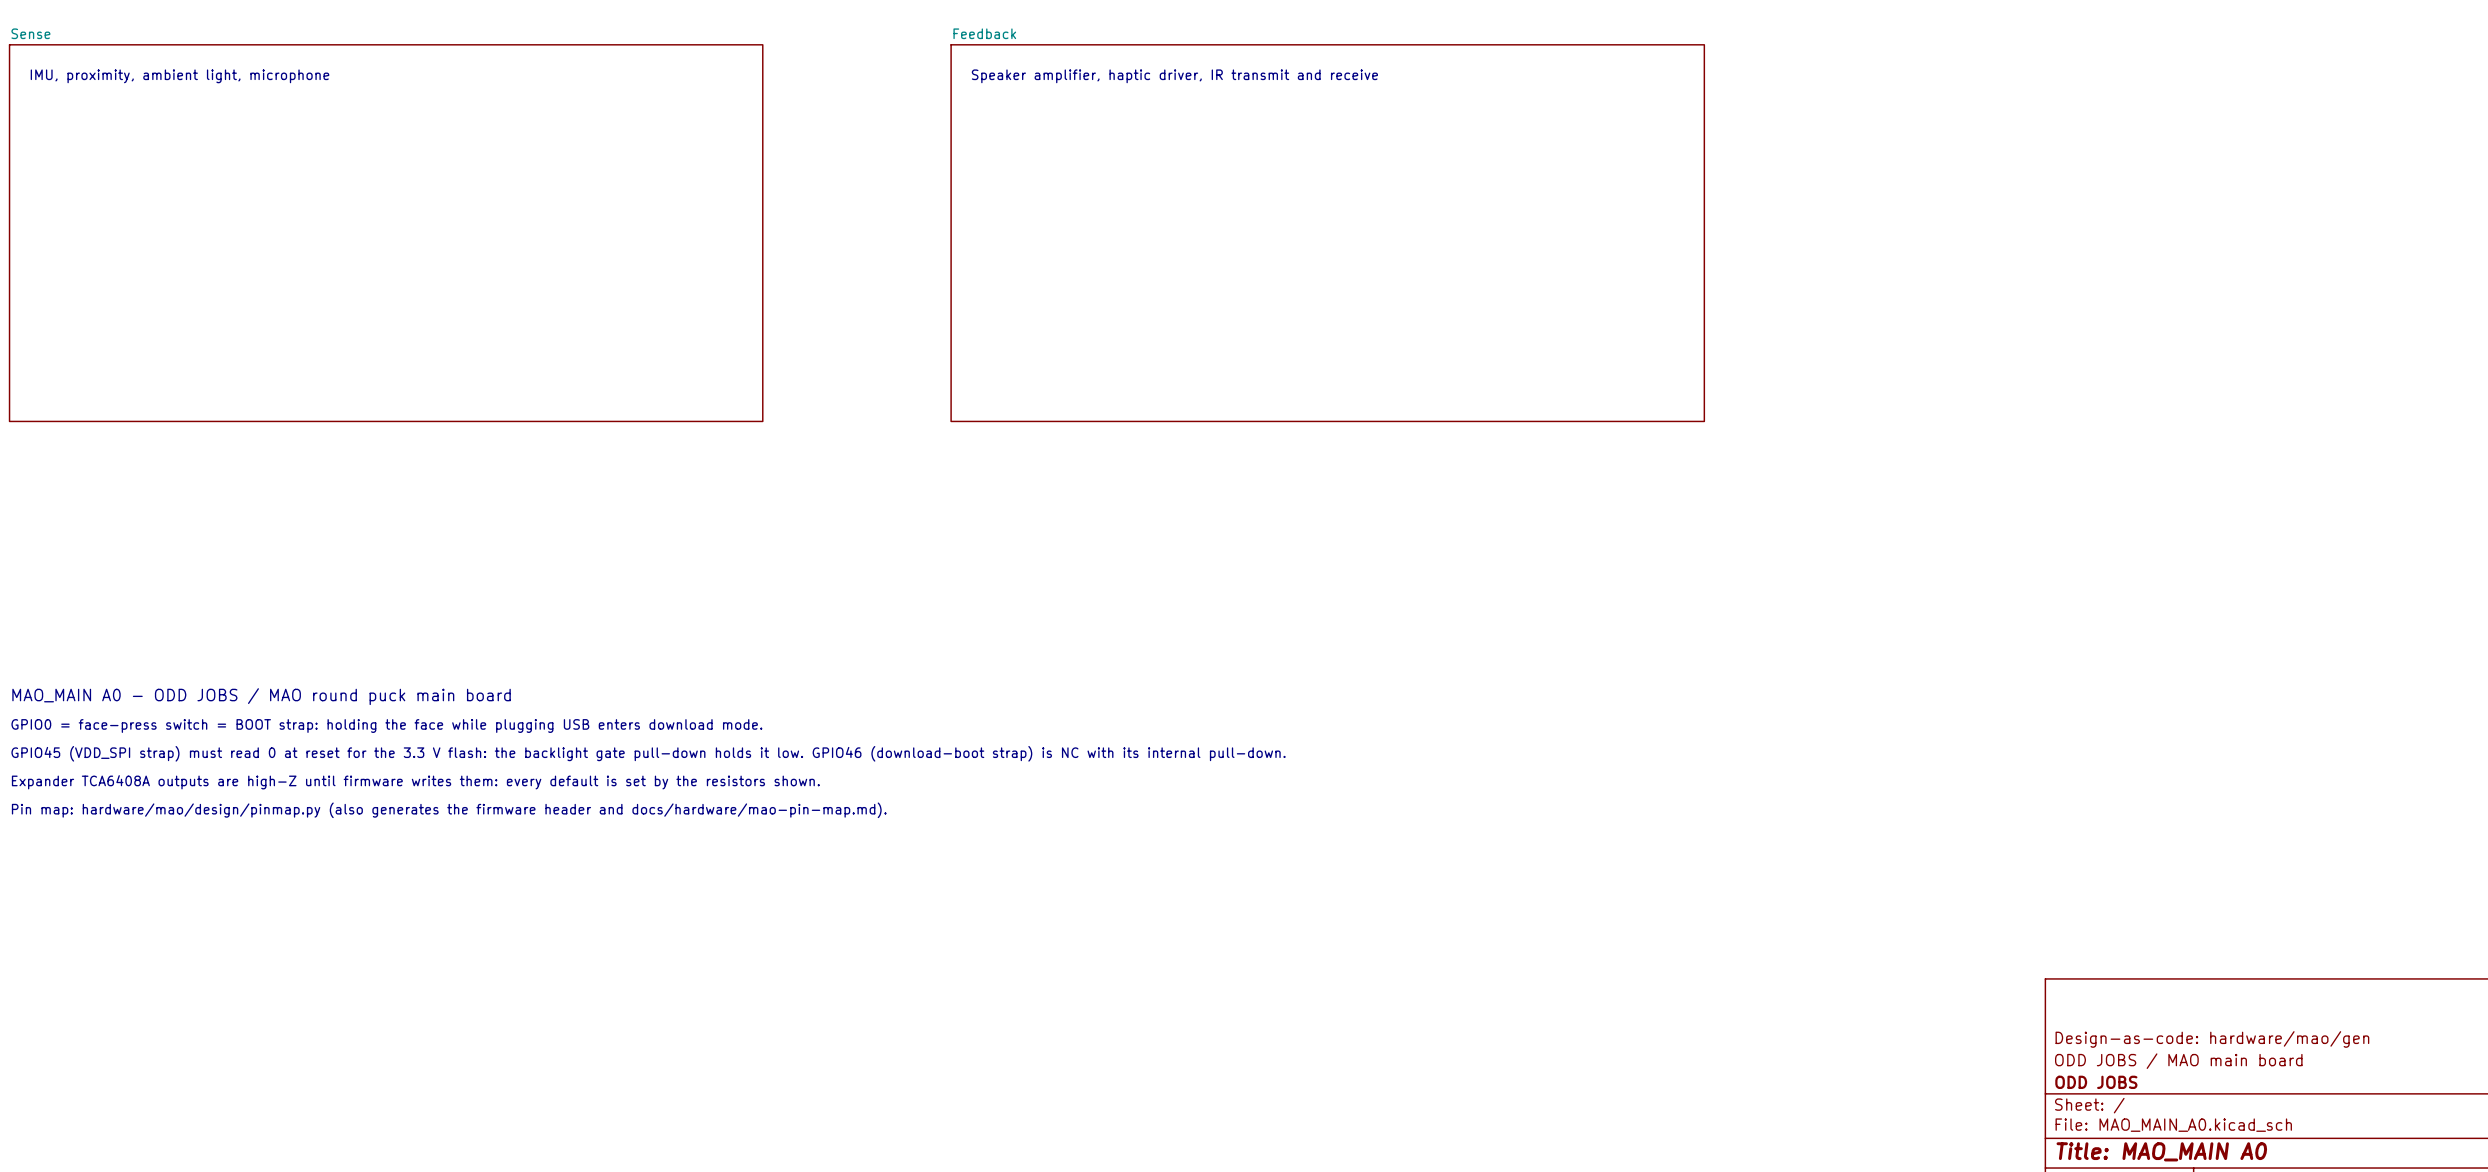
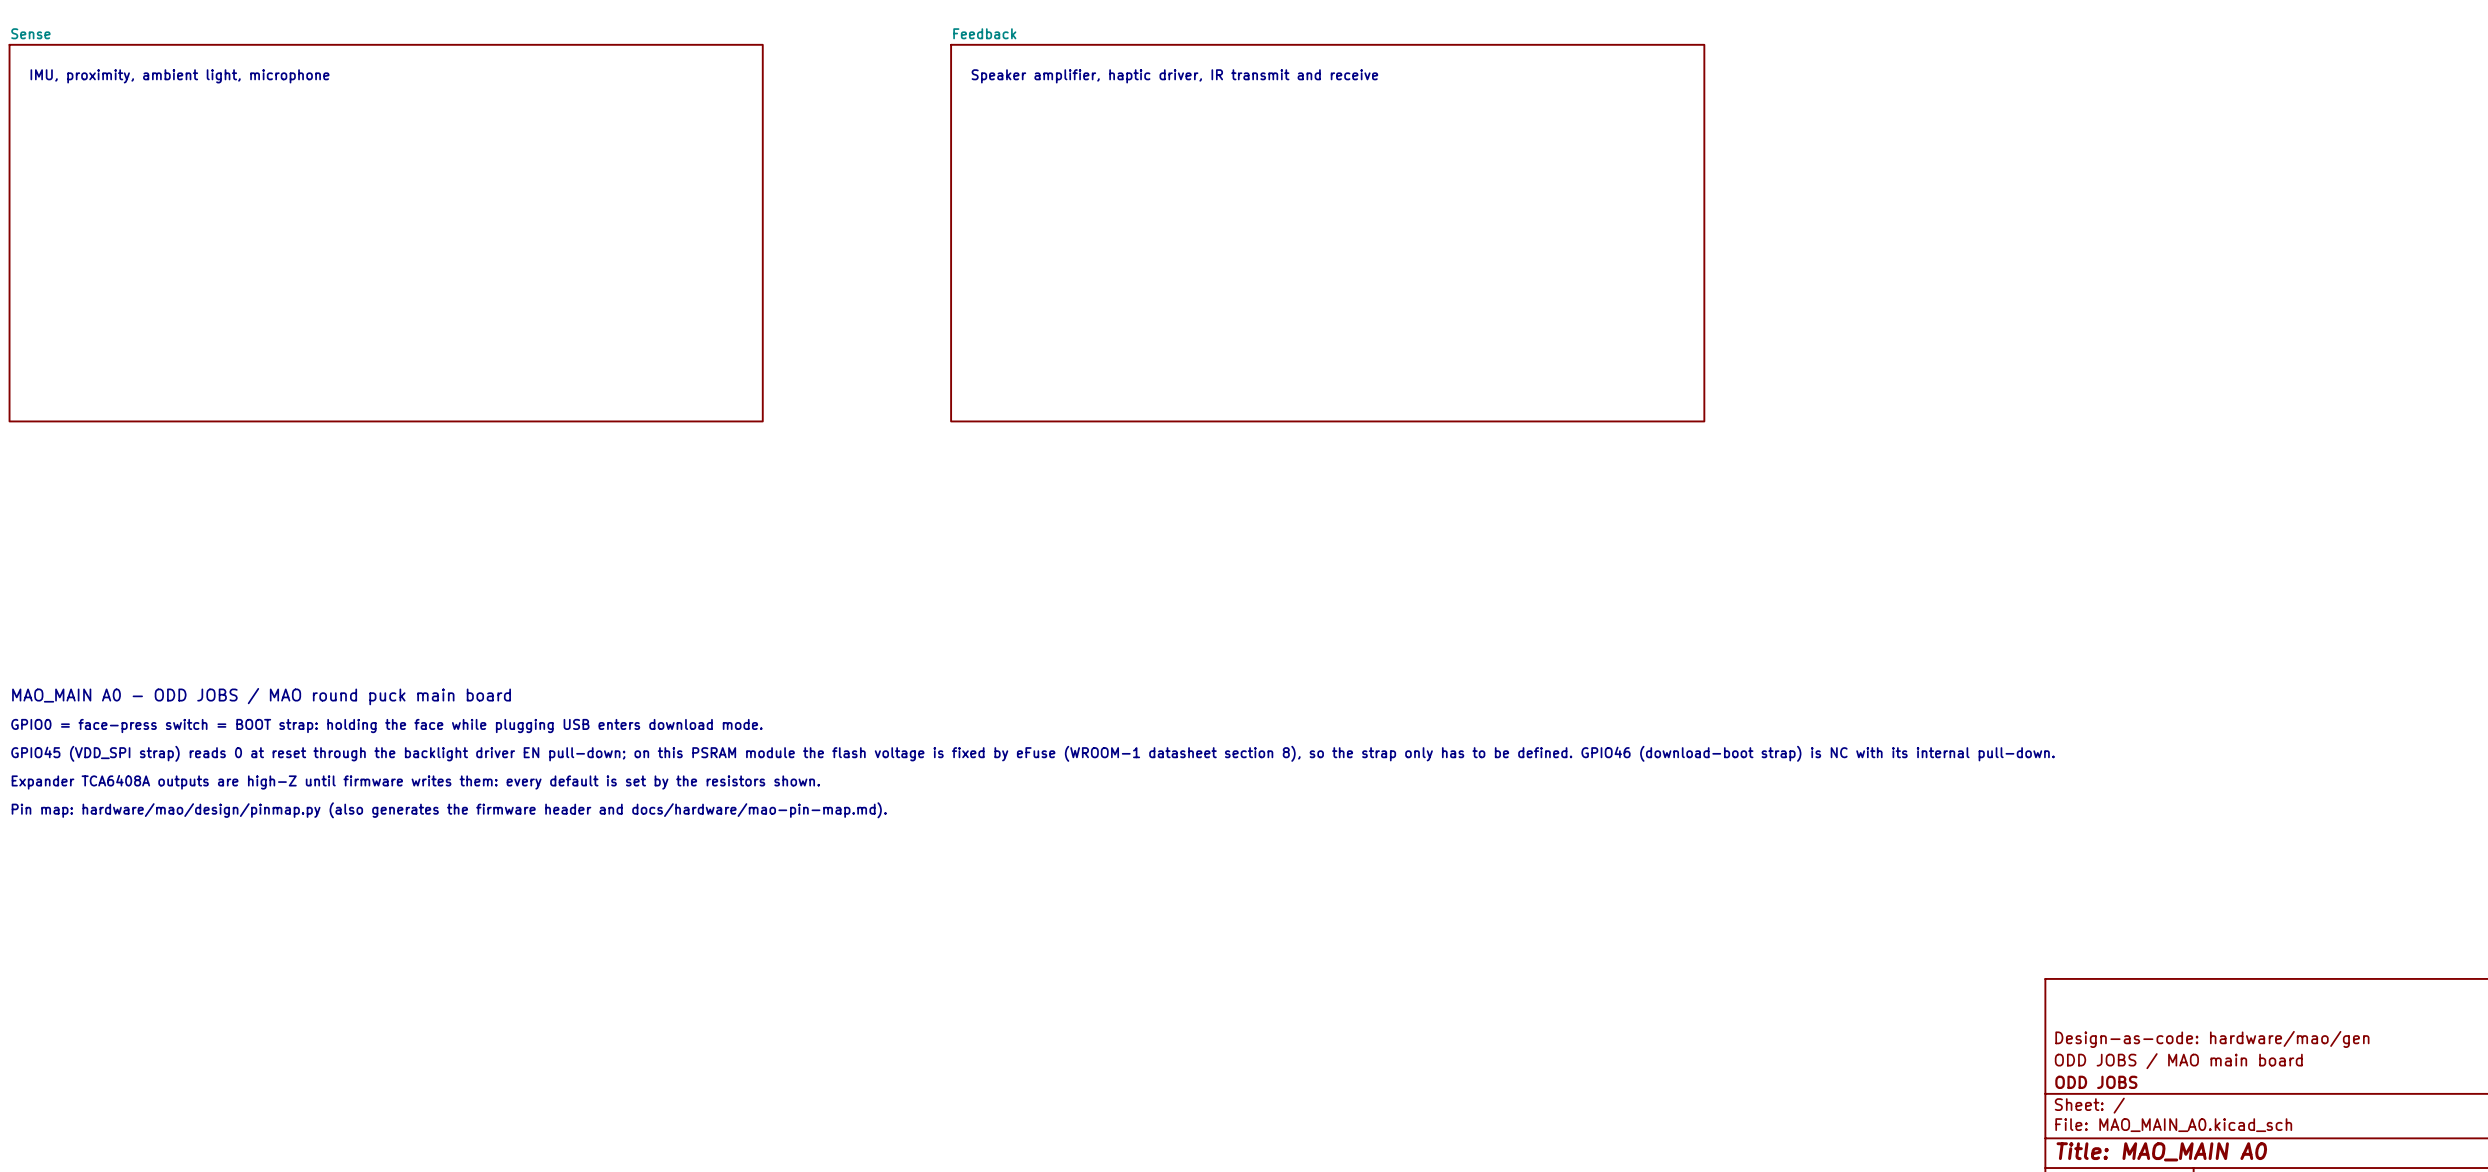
text: GPIO45 (VDD_SPI strap) must read 0 at reset for the 3.3 V flash: the backlight gate pull-down holds it low. GPIO46 (download-boot strap) is NC with its internal pull-down. (648, 753) -> GPIO45 (VDD_SPI strap) reads 0 at reset through the backlight driver EN pull-down; on this PSRAM module the flash voltage is fixed by eFuse (WROOM-1 datasheet section 8), so the strap only has to be defined. GPIO46 (download-boot strap) is NC with its internal pull-down. (1032, 753)

